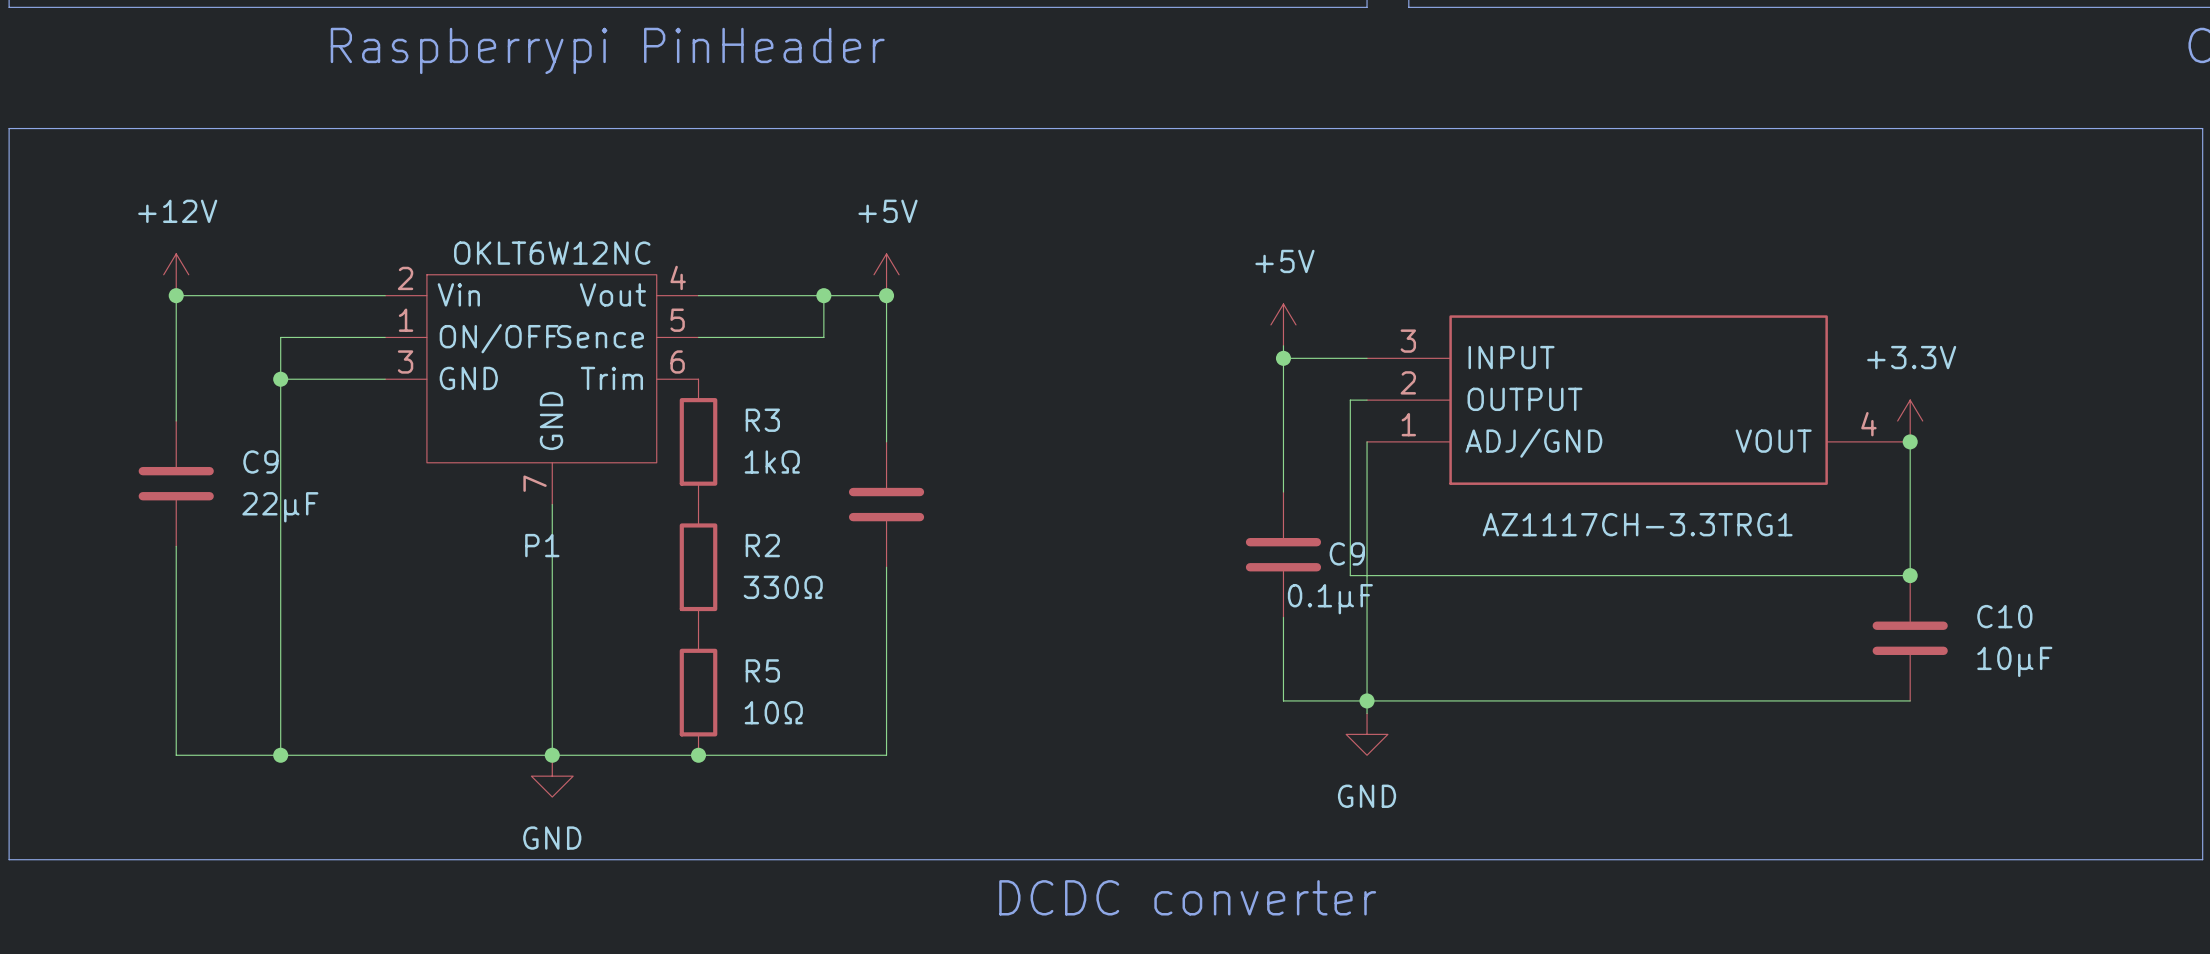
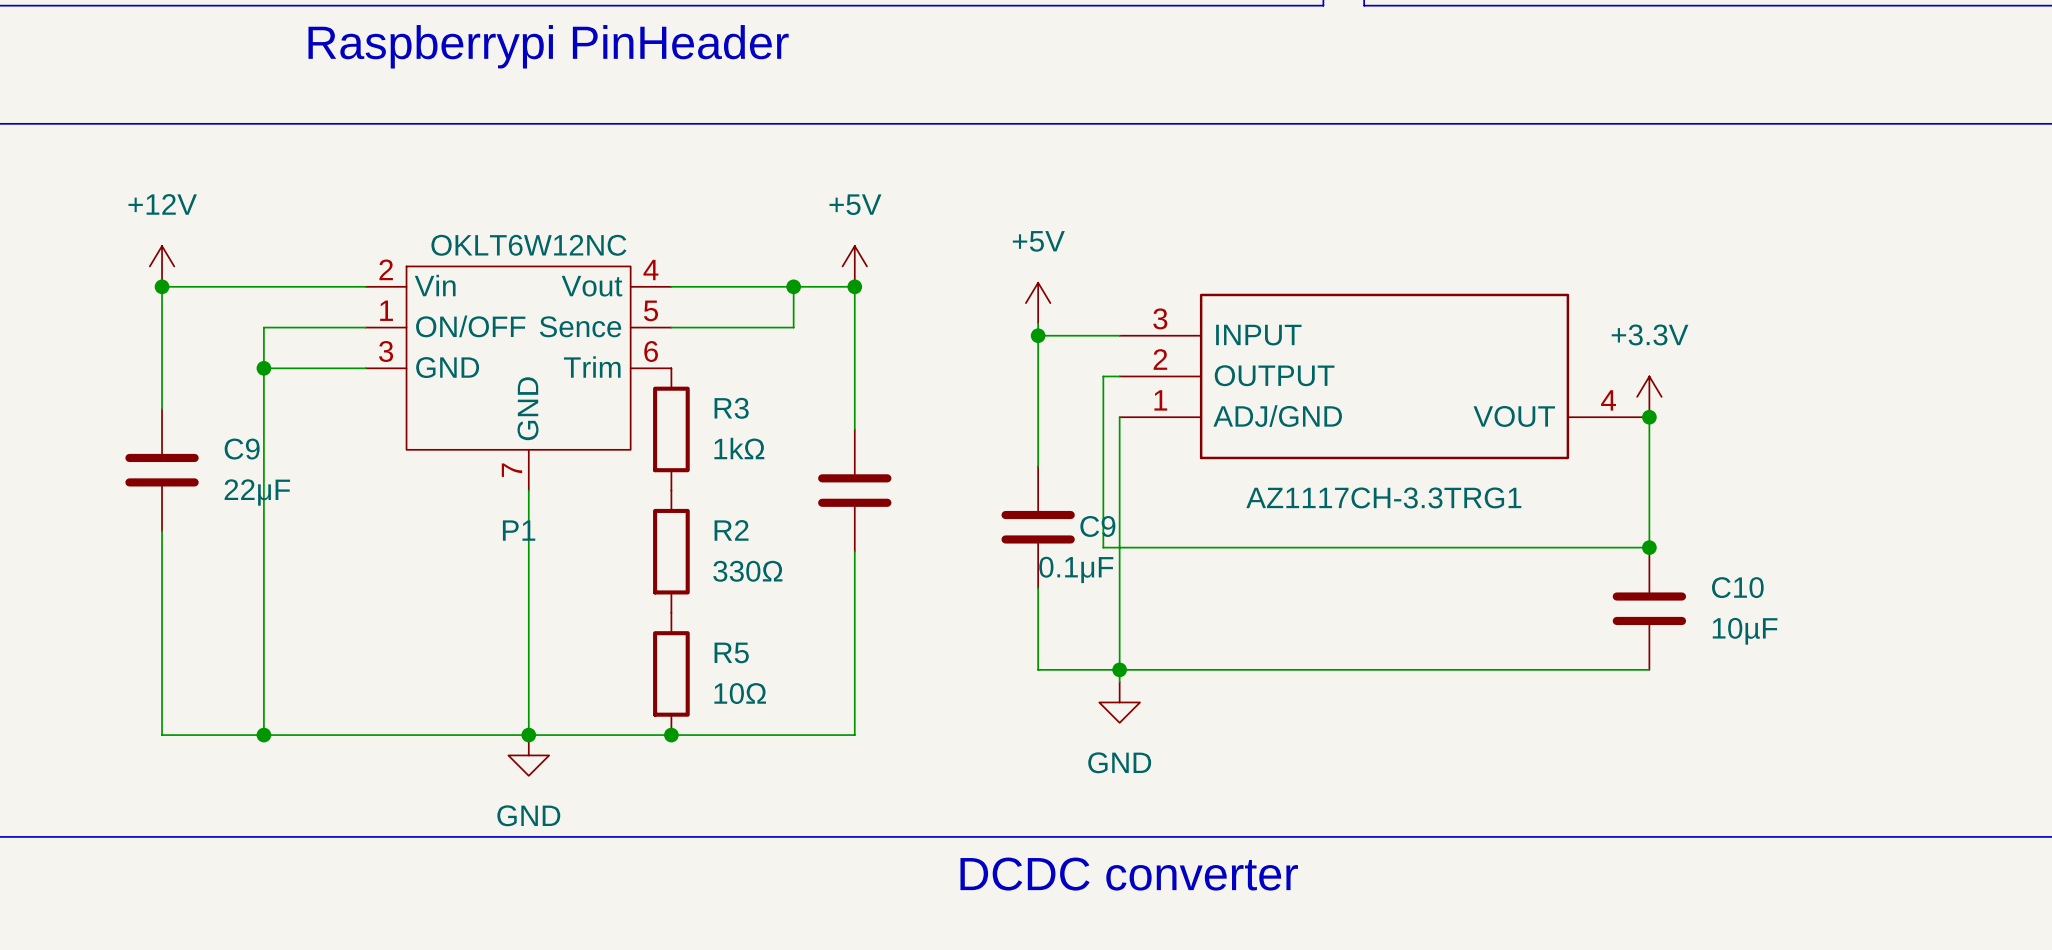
power symbol position: +5V (1283, 324) -> +5V (1038, 303)
junction: none -> (1038, 335)
wire: (1283, 345) (1283, 492) -> (1038, 323) (1038, 466)
wire: (1283, 358) (1367, 358) -> (1038, 335) (1119, 335)
junction: (1283, 358) -> none
wire: (1367, 400) (1350, 400) (1350, 575) (1910, 575) (1910, 441) -> (1119, 376) (1103, 376) (1103, 547) (1649, 547) (1649, 417)
part position: (1638, 400) -> (1384, 376)
power symbol position: +3.3V (1910, 421) -> +3.3V (1649, 396)
junction: none -> (1649, 417)
wire: (1367, 441) (1367, 713) -> (1119, 417) (1119, 682)
junction: (1910, 441) -> none
C9 position: (1283, 554) -> (1038, 527)
junction: none -> (1649, 547)
junction: (1910, 575) -> none
wire: (1283, 617) (1283, 700) (1910, 700) -> (1038, 588) (1038, 669) (1649, 669)
C10 position: (1910, 638) -> (1649, 608)
junction: none -> (1119, 669)
junction: (1367, 700) -> none
power symbol position: GND (1367, 734) -> GND (1119, 702)

